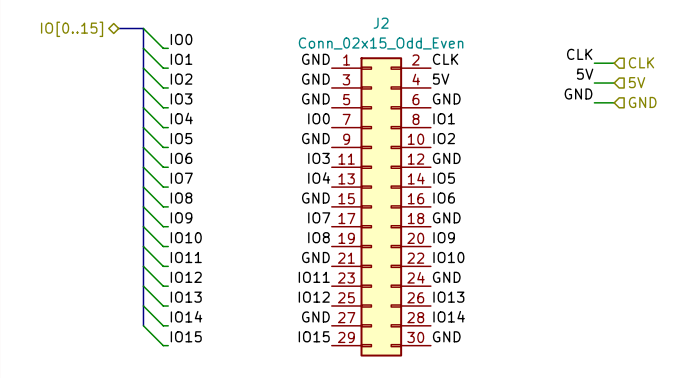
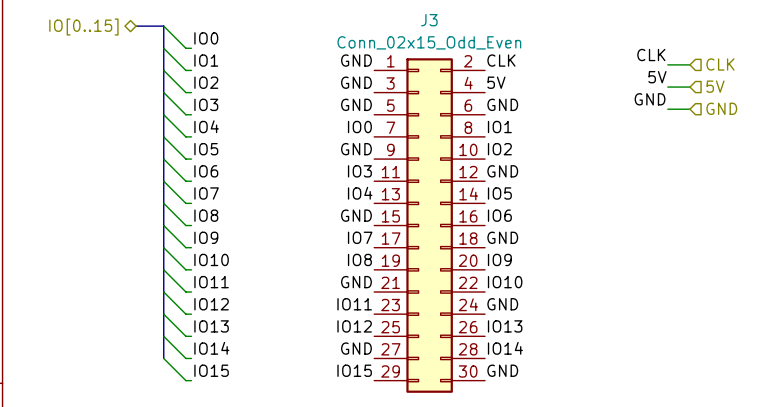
J2 name: J2 (381, 23) -> J3 (429, 20)

